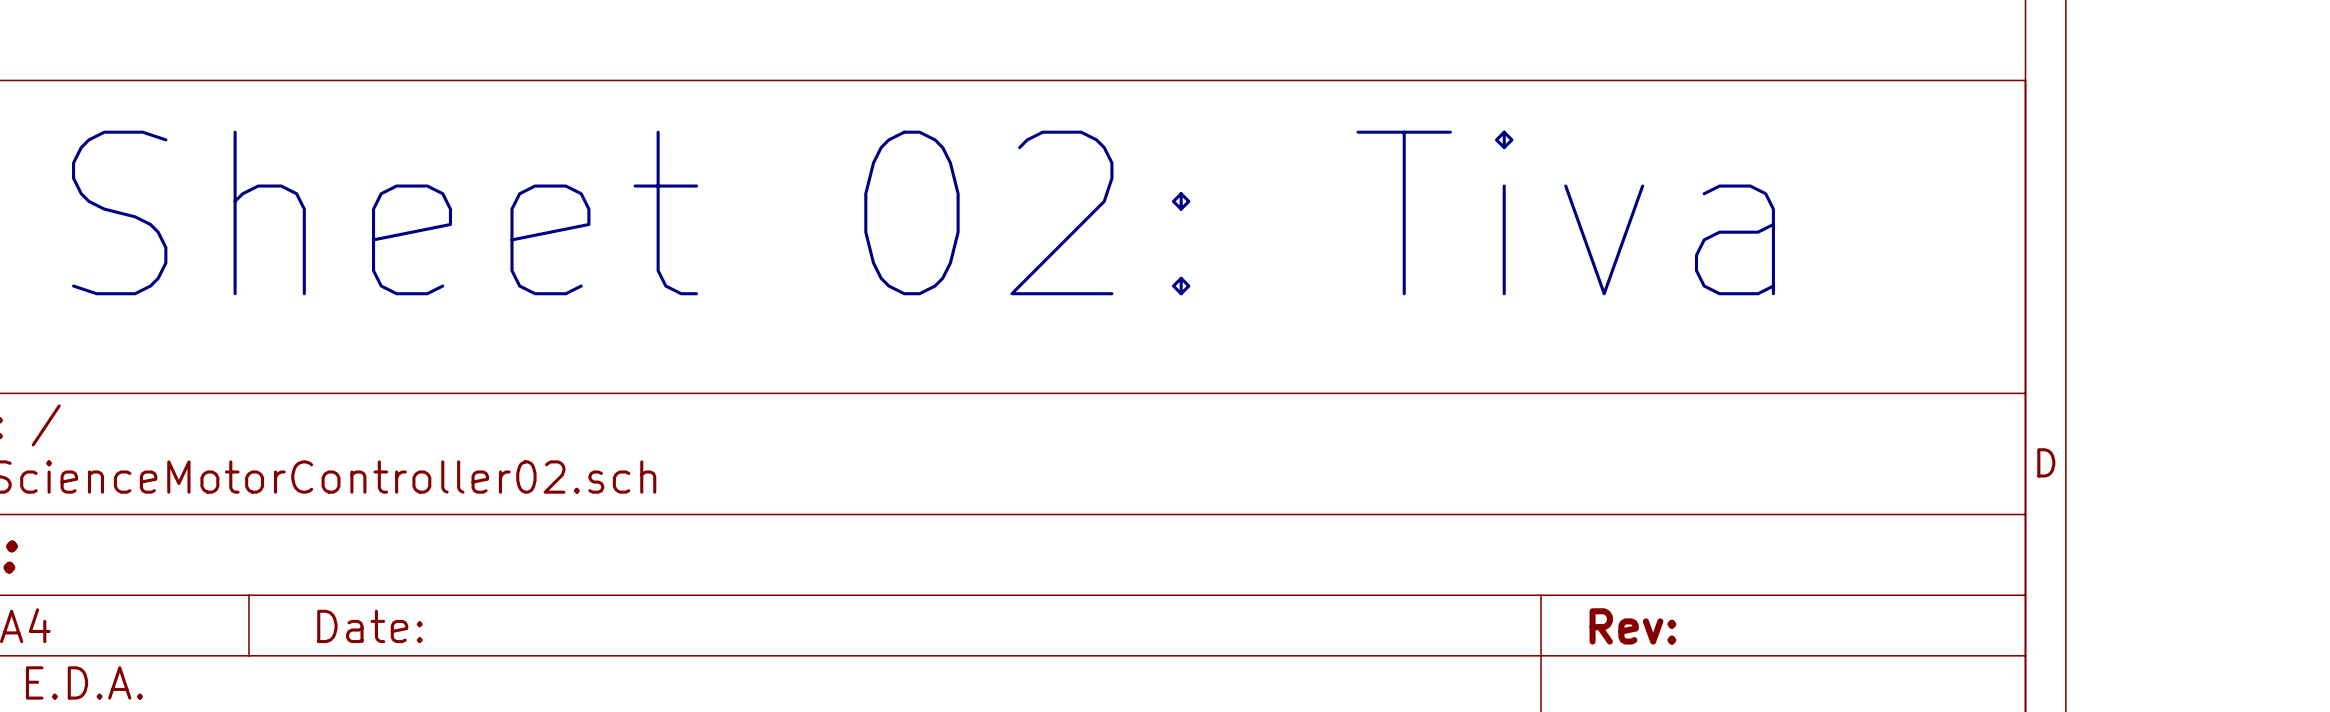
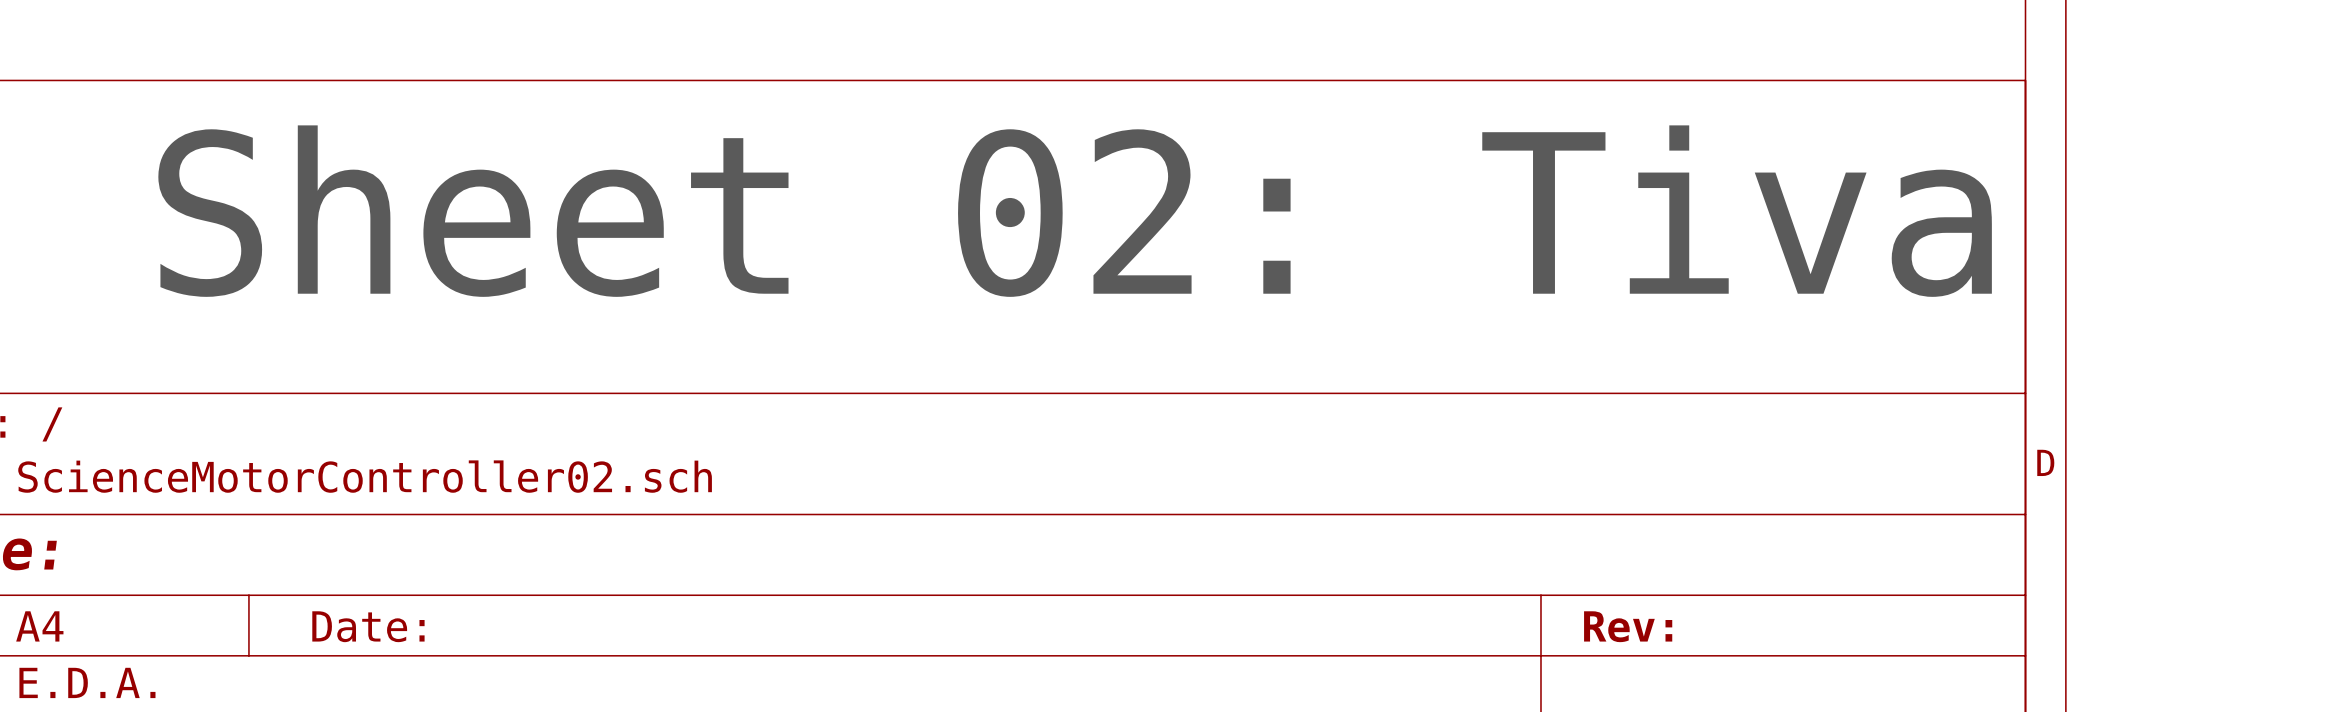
text position: Sheet 02: Tiva (923, 212) -> Sheet 02: Tiva (1075, 211)

